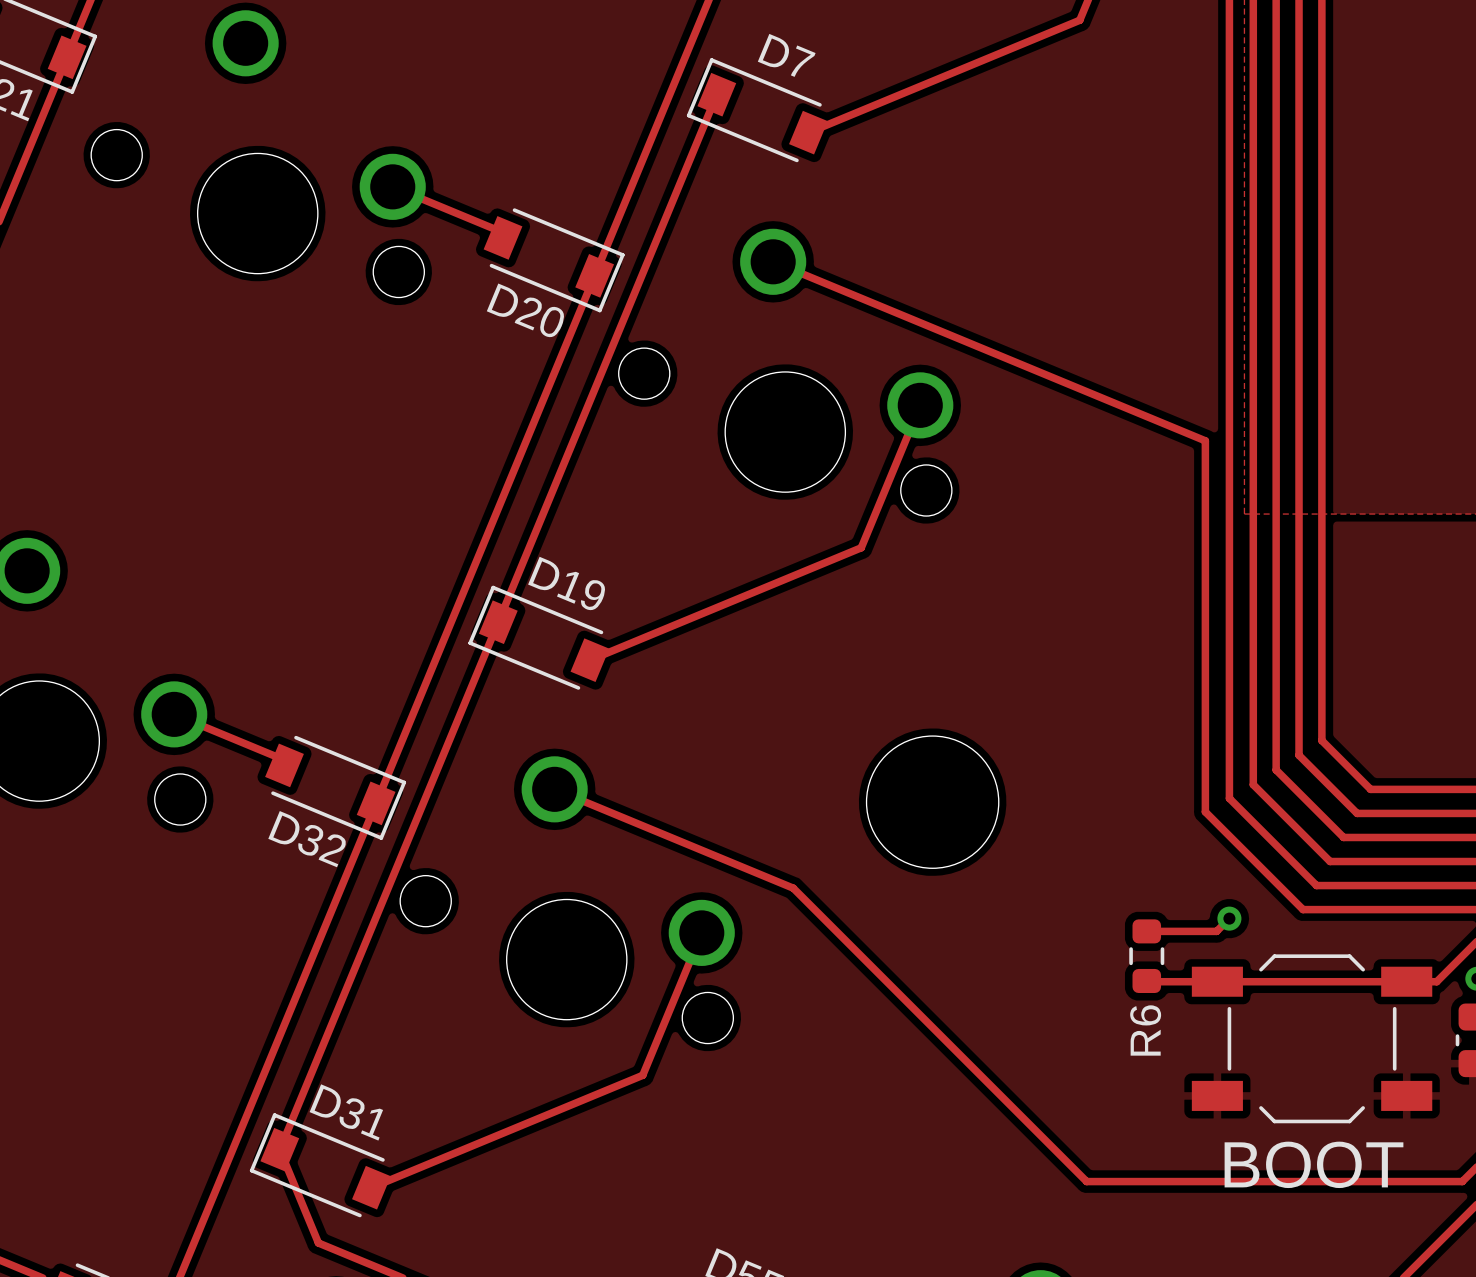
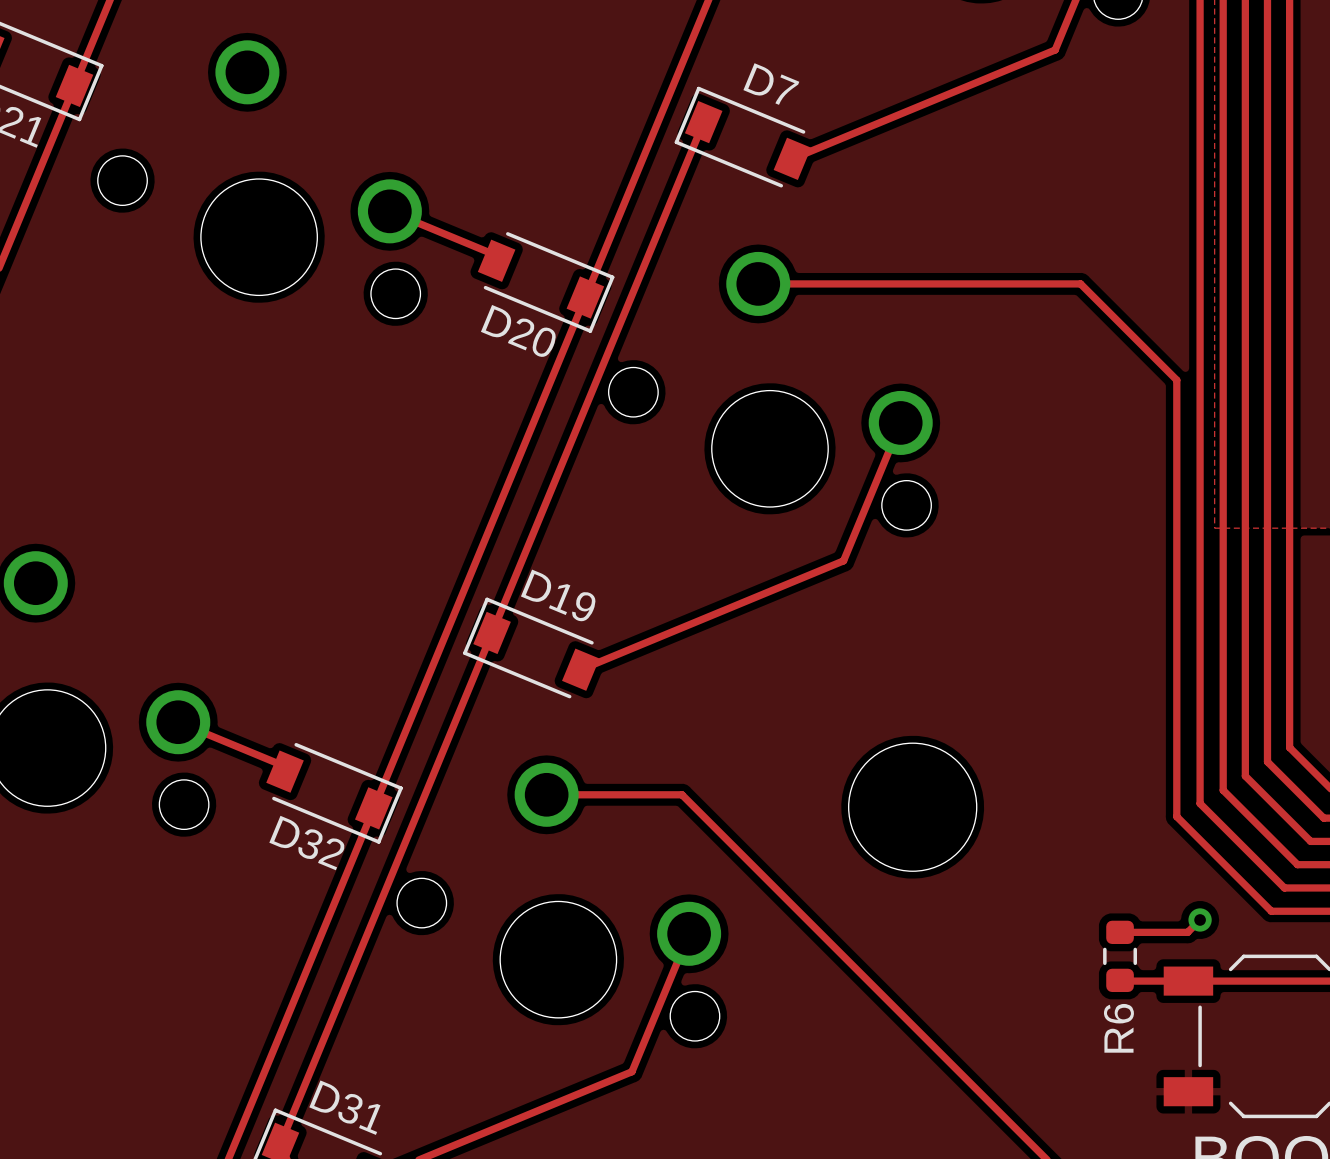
track: (773, 261) (1205, 440) -> (758, 283) (1080, 283) (1176, 380) (1176, 457)
track: (554, 789) (793, 888) -> (546, 794) (682, 794) (777, 890)

